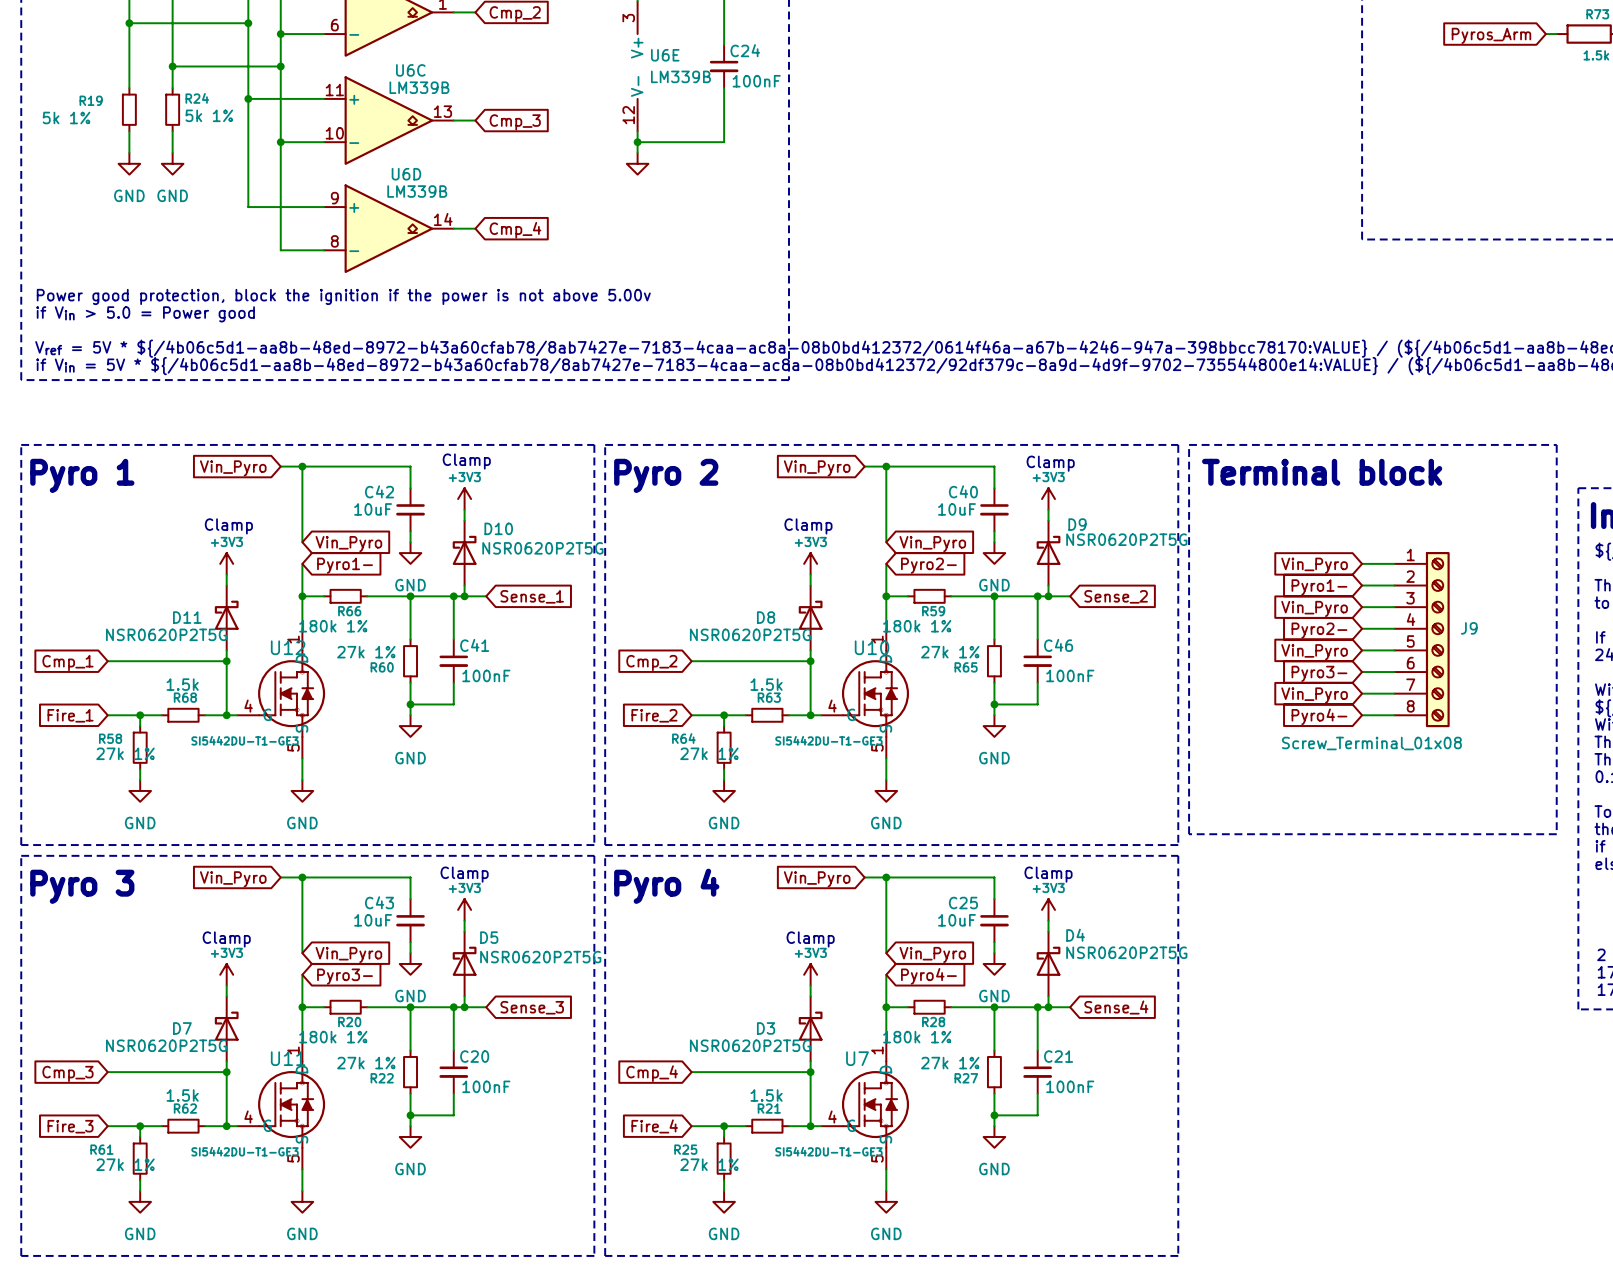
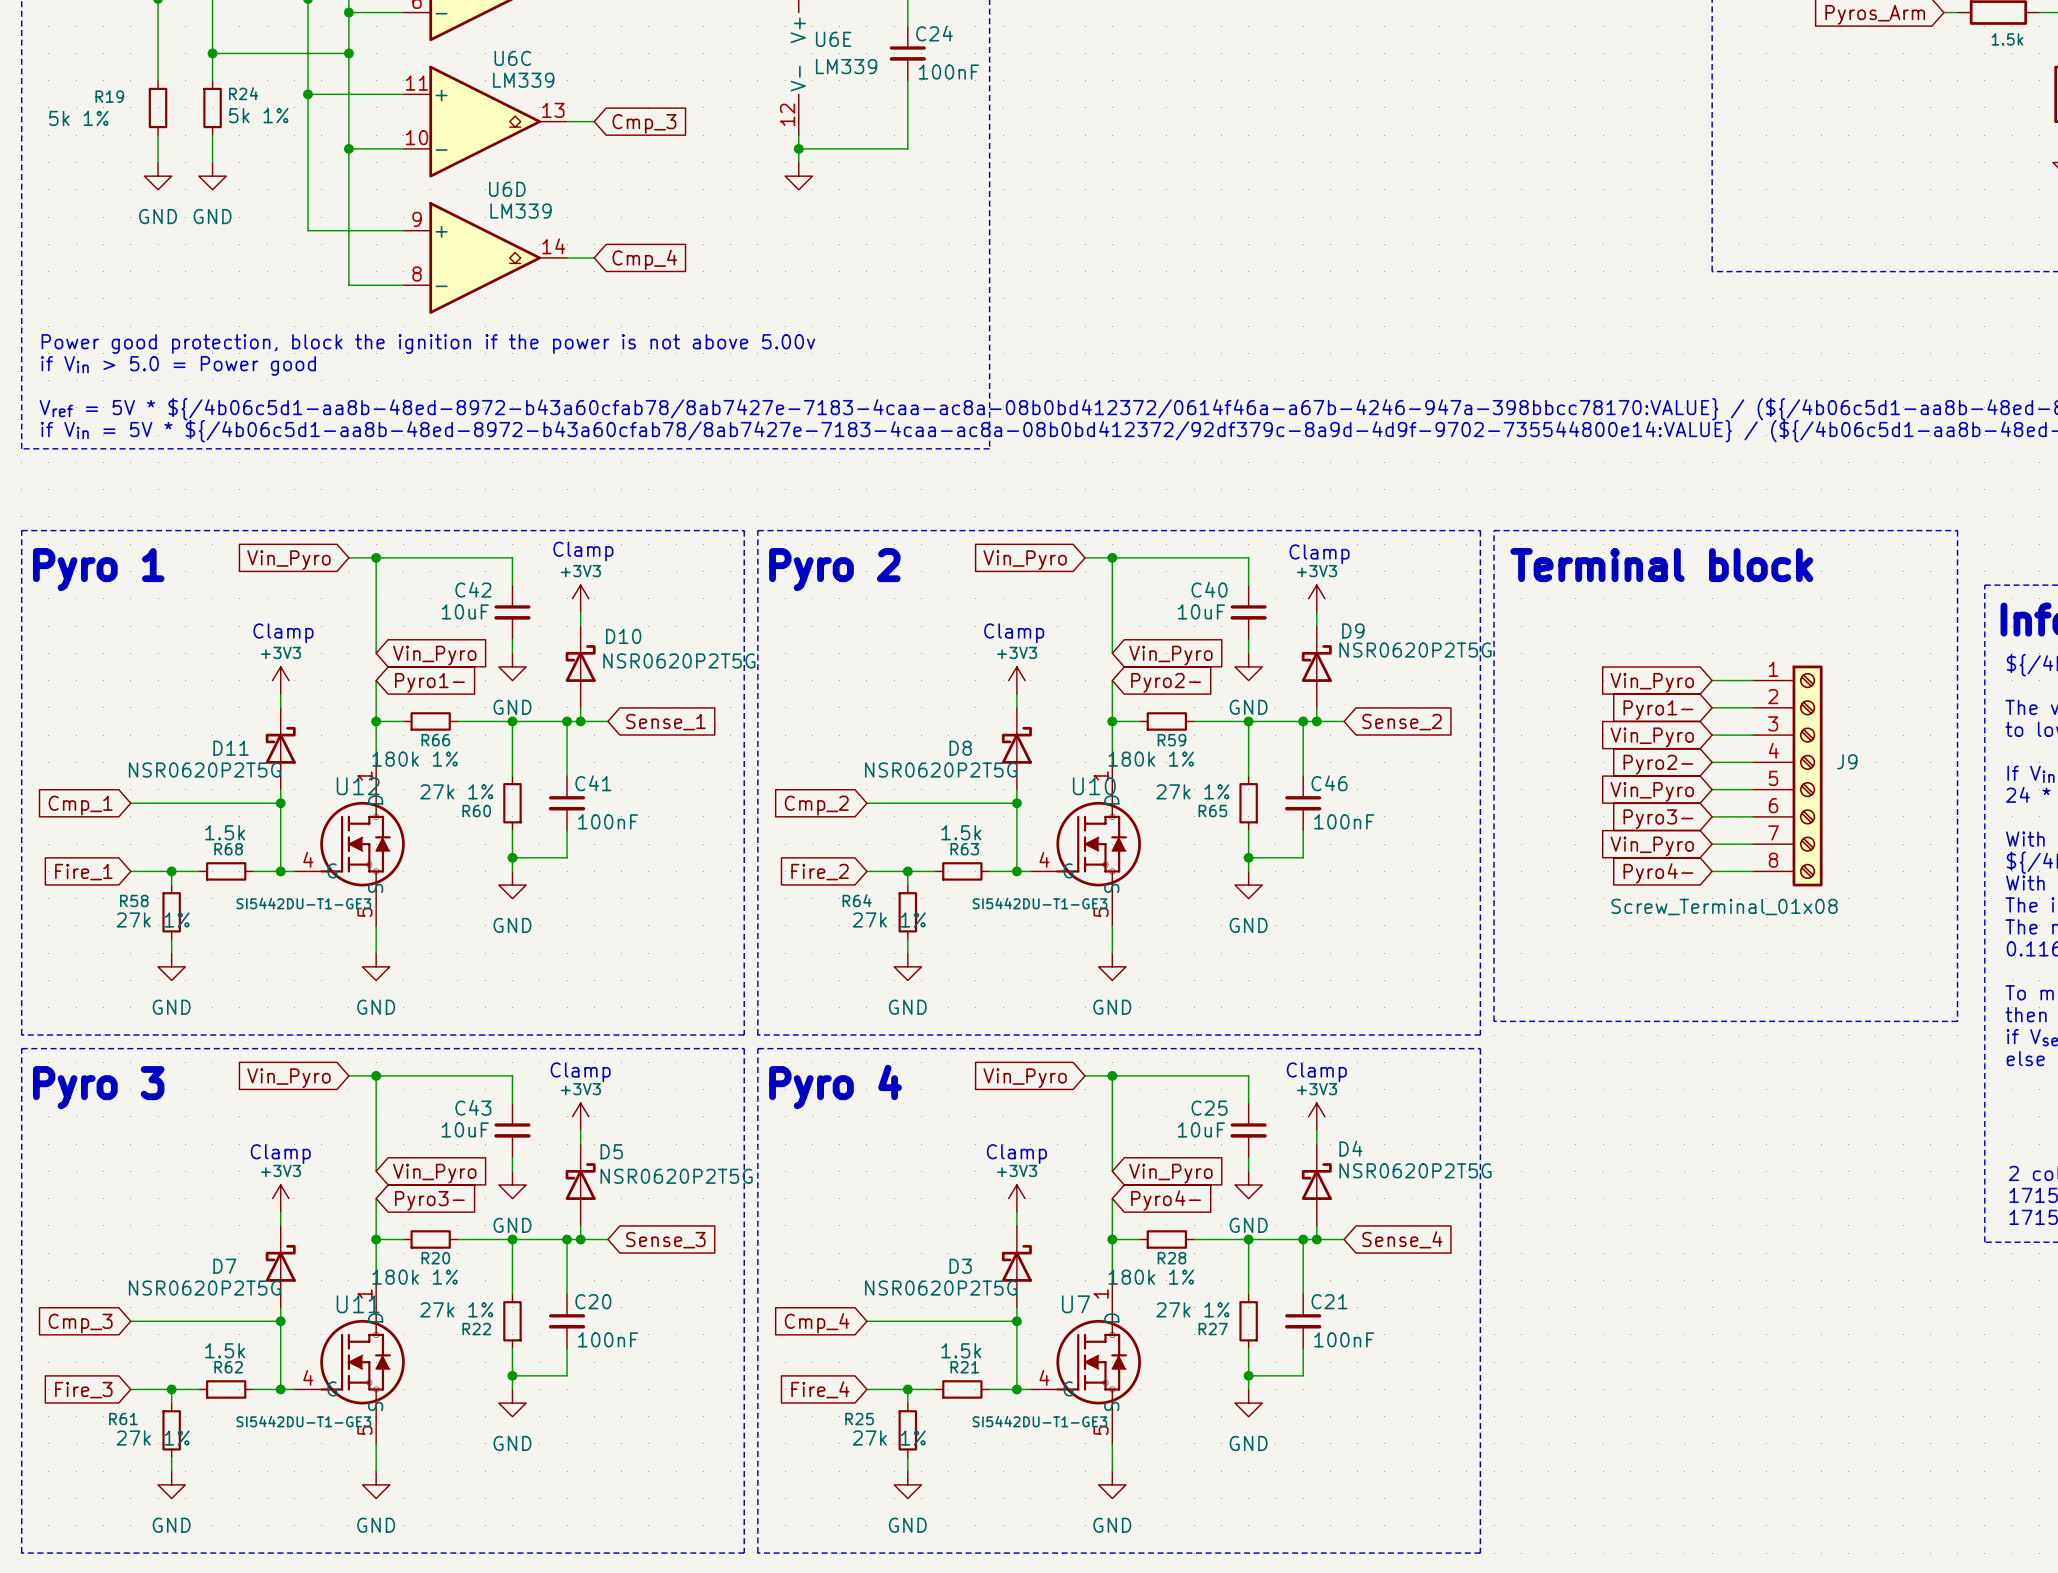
U6E value: LM339B (680, 76) -> LM339 (846, 66)
U6C value: LM339B (419, 87) -> LM339 (523, 80)
U6D value: LM339B (417, 191) -> LM339 (520, 211)

